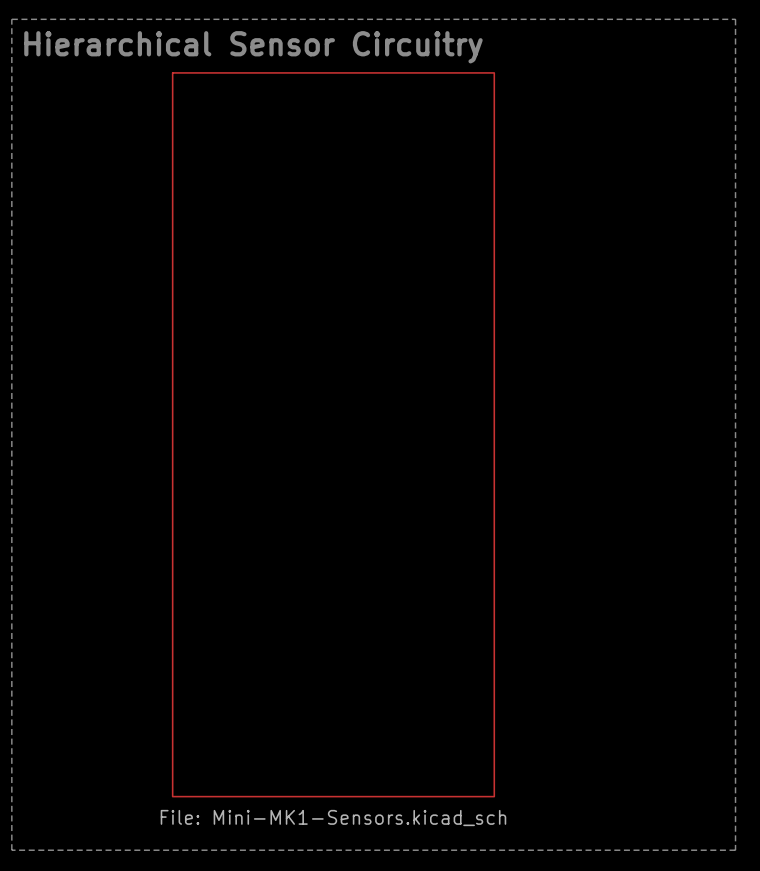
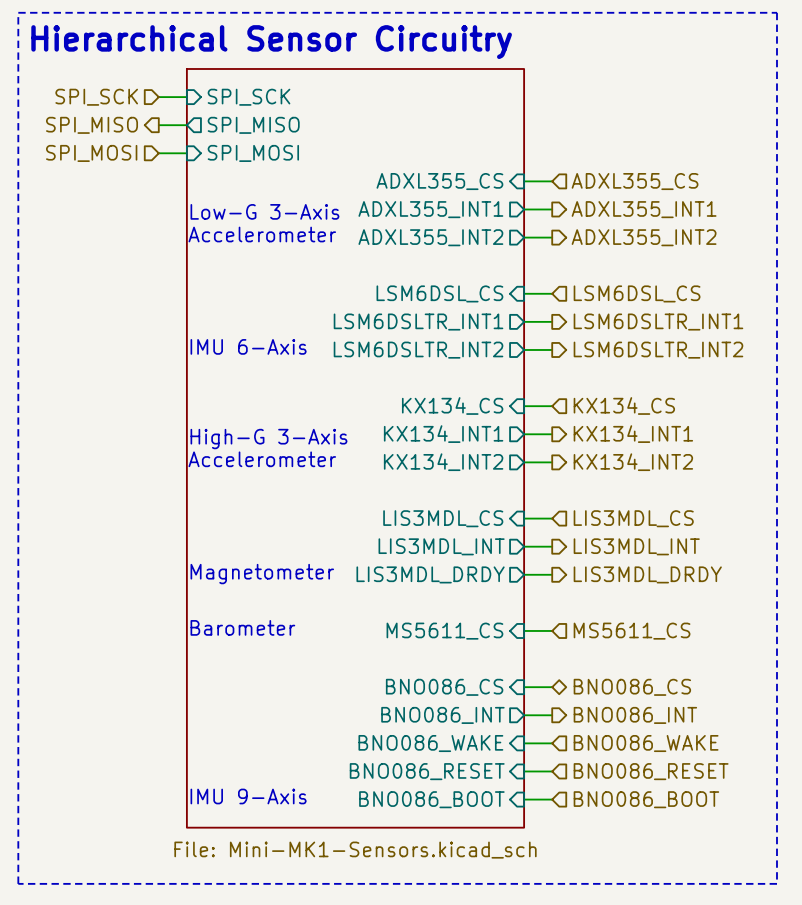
hierarchical label: none -> SPI_SCK (96, 97)
wire: none -> (158, 97) (186, 97)
sheet pin: none -> SPI_SCK (249, 97)
hierarchical label: none -> SPI_MISO (92, 125)
wire: none -> (158, 125) (186, 125)
sheet pin: none -> SPI_MISO (253, 125)
hierarchical label: none -> SPI_MOSI (91, 153)
wire: none -> (158, 153) (186, 153)
sheet pin: none -> SPI_MOSI (253, 153)
sheet pin: none -> ADXL355_CS (439, 181)
wire: none -> (524, 181) (552, 181)
hierarchical label: none -> ADXL355_CS (635, 181)
wire: none -> (524, 209) (552, 209)
sheet pin: none -> ADXL355_INT1 (430, 209)
hierarchical label: none -> ADXL355_INT1 (644, 209)
text: none -> Low-G 3-Axis (264, 211)
text: none -> Accelerometer (262, 234)
sheet pin: none -> ADXL355_INT2 (430, 237)
wire: none -> (524, 237) (552, 237)
hierarchical label: none -> ADXL355_INT2 (644, 237)
sheet pin: none -> LSM6DSL_CS (439, 293)
wire: none -> (524, 293) (552, 293)
hierarchical label: none -> LSM6DSL_CS (637, 293)
sheet pin: none -> LSM6DSLTR_INT1 (418, 322)
wire: none -> (524, 321) (552, 321)
hierarchical label: none -> LSM6DSLTR_INT1 (658, 322)
text: none -> IMU 6-Axis (248, 346)
wire: none -> (524, 349) (552, 349)
sheet pin: none -> LSM6DSLTR_INT2 (418, 350)
hierarchical label: none -> LSM6DSLTR_INT2 (658, 350)
sheet pin: none -> KX134_CS (452, 405)
wire: none -> (524, 406) (552, 406)
hierarchical label: none -> KX134_CS (624, 405)
sheet pin: none -> KX134_INT1 (443, 434)
wire: none -> (524, 434) (552, 434)
hierarchical label: none -> KX134_INT1 (633, 434)
text: none -> High-G 3-Axis (268, 439)
text: none -> Accelerometer (262, 459)
sheet pin: none -> KX134_INT2 (443, 462)
wire: none -> (524, 462) (552, 462)
hierarchical label: none -> KX134_INT2 (633, 462)
sheet pin: none -> LIS3MDL_CS (443, 518)
wire: none -> (524, 518) (552, 518)
hierarchical label: none -> LIS3MDL_CS (633, 518)
sheet pin: none -> LIS3MDL_INT (441, 546)
wire: none -> (524, 546) (552, 546)
hierarchical label: none -> LIS3MDL_INT (636, 546)
text: none -> Magnetometer (262, 574)
sheet pin: none -> LIS3MDL_DRDY (430, 574)
wire: none -> (524, 574) (552, 574)
hierarchical label: none -> LIS3MDL_DRDY (647, 574)
text: none -> Barometer (242, 627)
sheet pin: none -> MS5611_CS (444, 631)
wire: none -> (524, 630) (552, 630)
hierarchical label: none -> MS5611_CS (632, 631)
sheet pin: none -> BNO086_CS (444, 687)
wire: none -> (524, 687) (552, 687)
hierarchical label: none -> BNO086_CS (632, 687)
sheet pin: none -> BNO086_INT (442, 715)
wire: none -> (524, 715) (552, 715)
hierarchical label: none -> BNO086_INT (635, 715)
sheet pin: none -> BNO086_WAKE (430, 743)
wire: none -> (524, 743) (552, 743)
hierarchical label: none -> BNO086_WAKE (646, 743)
sheet pin: none -> BNO086_RESET (427, 771)
wire: none -> (524, 771) (552, 771)
hierarchical label: none -> BNO086_RESET (651, 771)
text: none -> IMU 9-Axis (248, 796)
sheet pin: none -> BNO086_BOOT (431, 799)
wire: none -> (524, 799) (552, 799)
hierarchical label: none -> BNO086_BOOT (646, 799)

